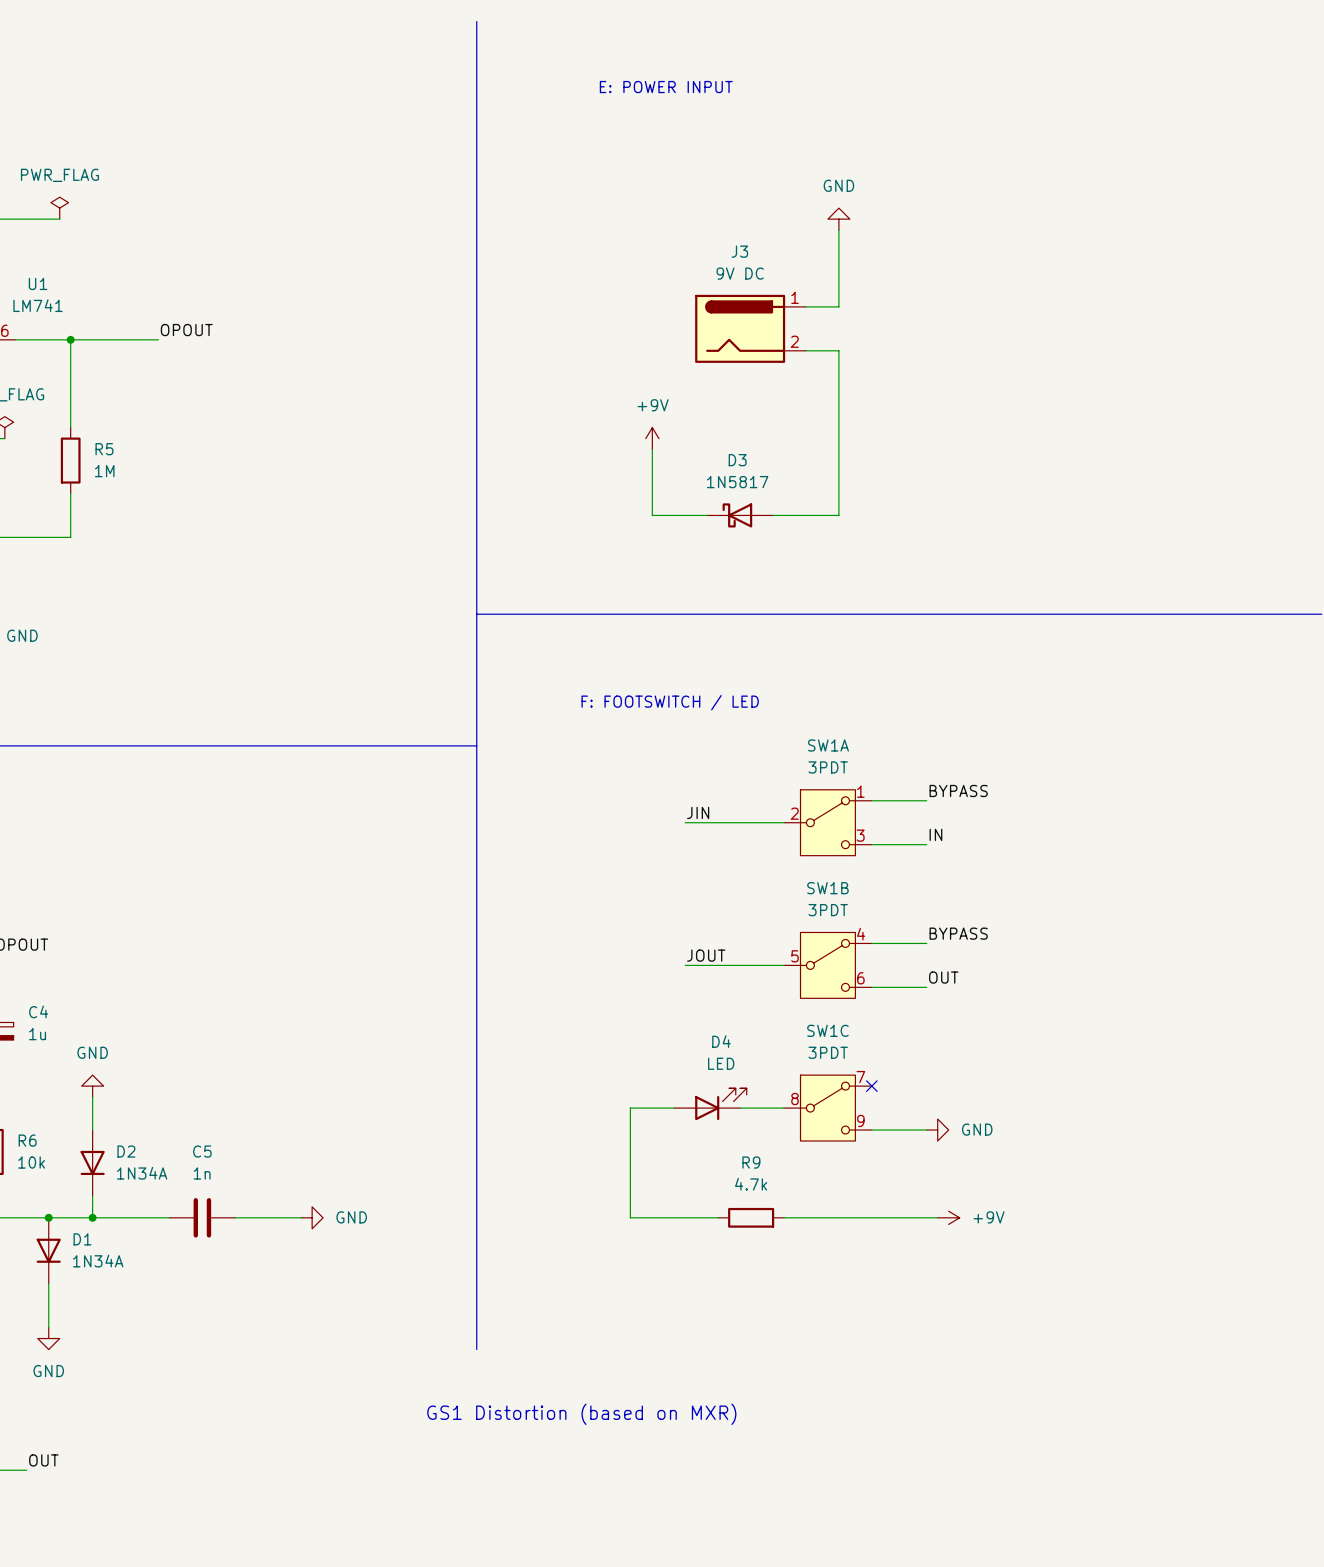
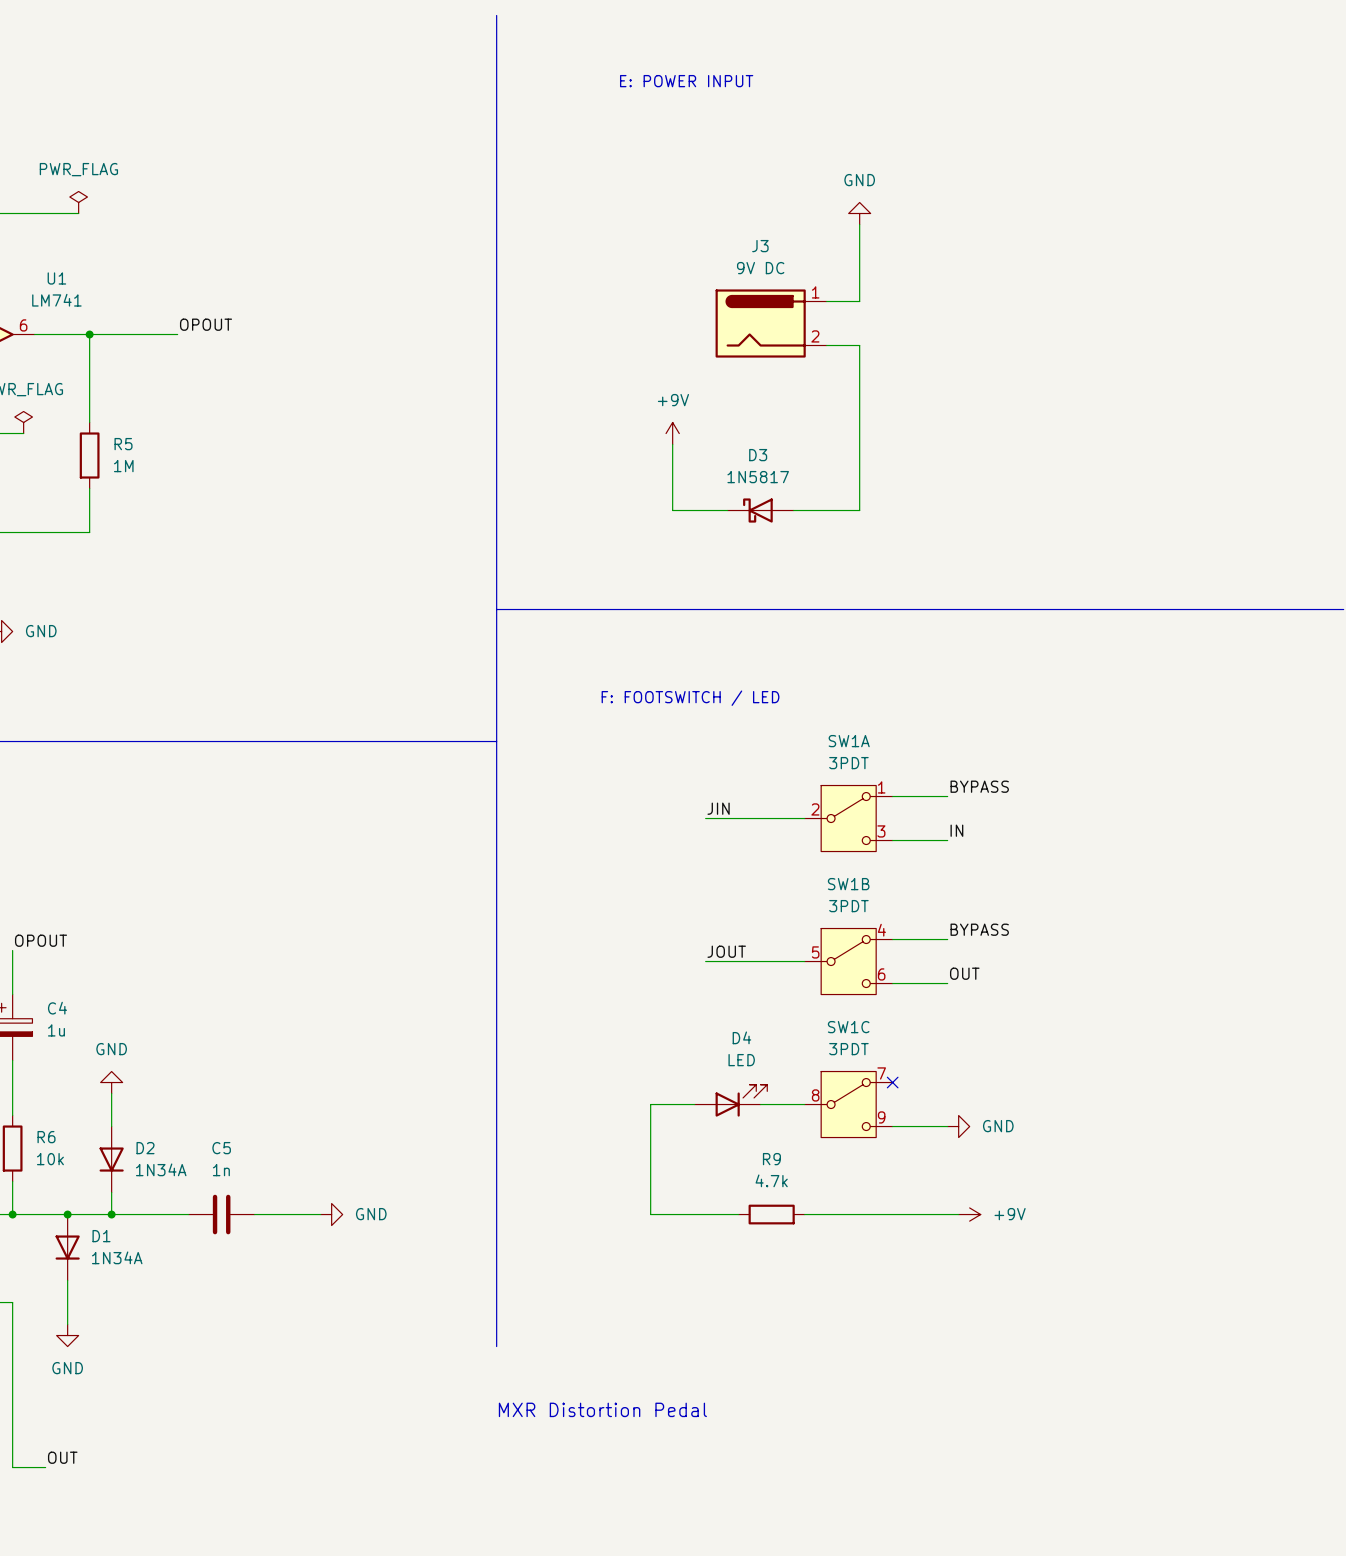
text: GS1 Distortion (based on MXR) (581, 1414) -> MXR Distortion Pedal (602, 1409)

